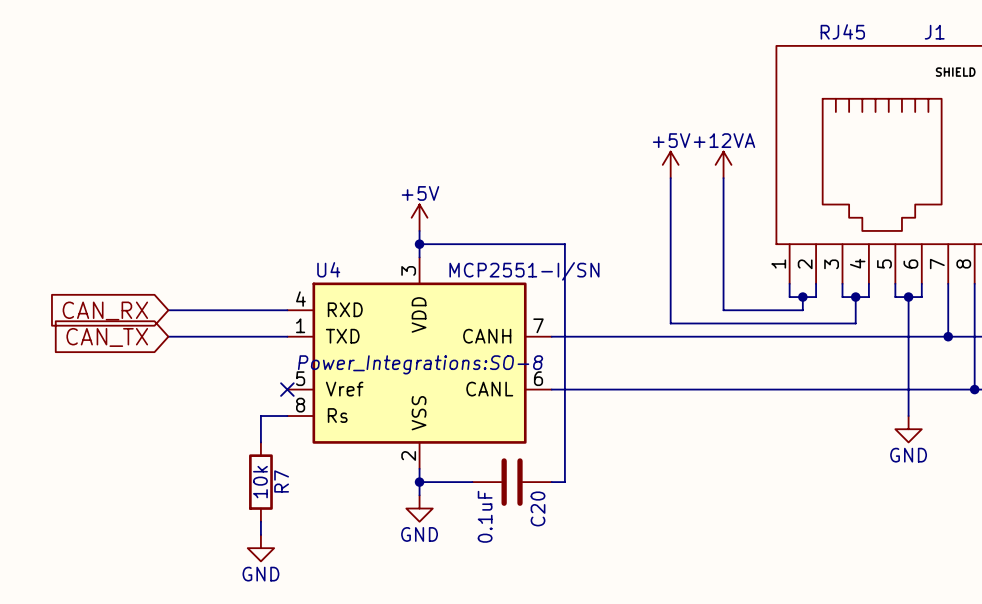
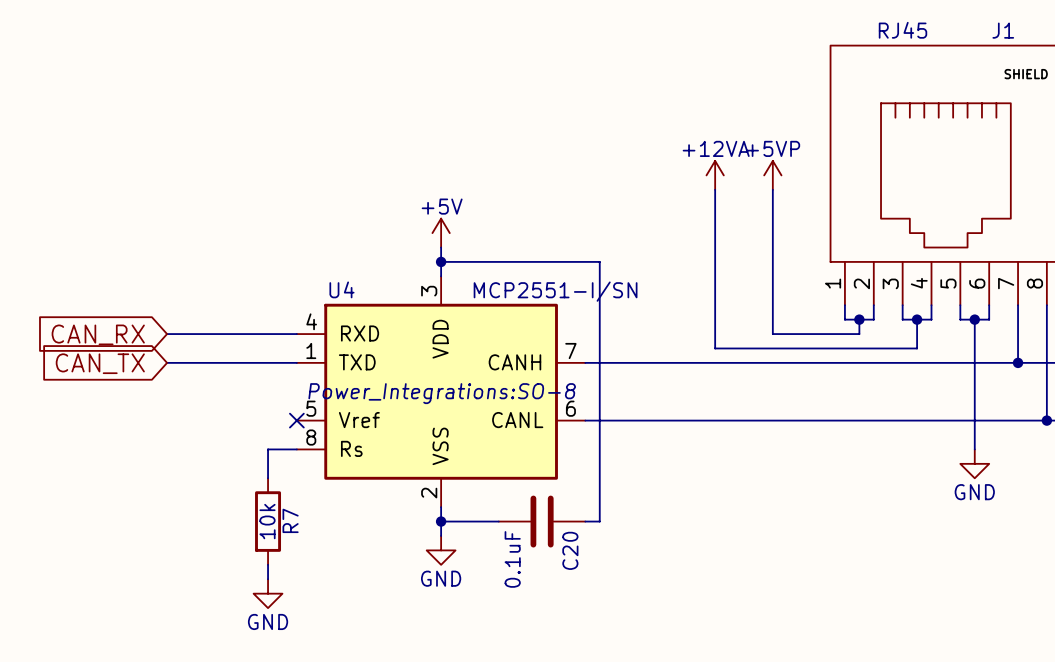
power symbol: +5V (670, 164) -> +12VA (715, 175)
power symbol: +12VA (723, 164) -> +5VP (772, 175)

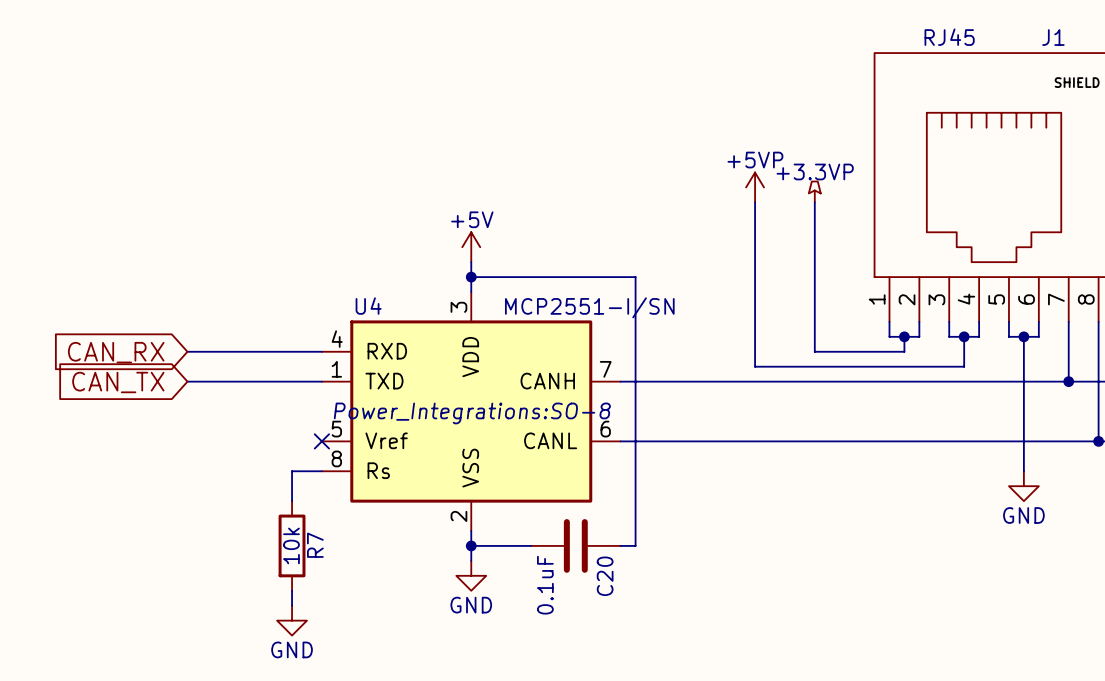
power symbol: +12VA (715, 175) -> +5VP (755, 187)
power symbol: +5VP (772, 175) -> +3.3VP (814, 191)

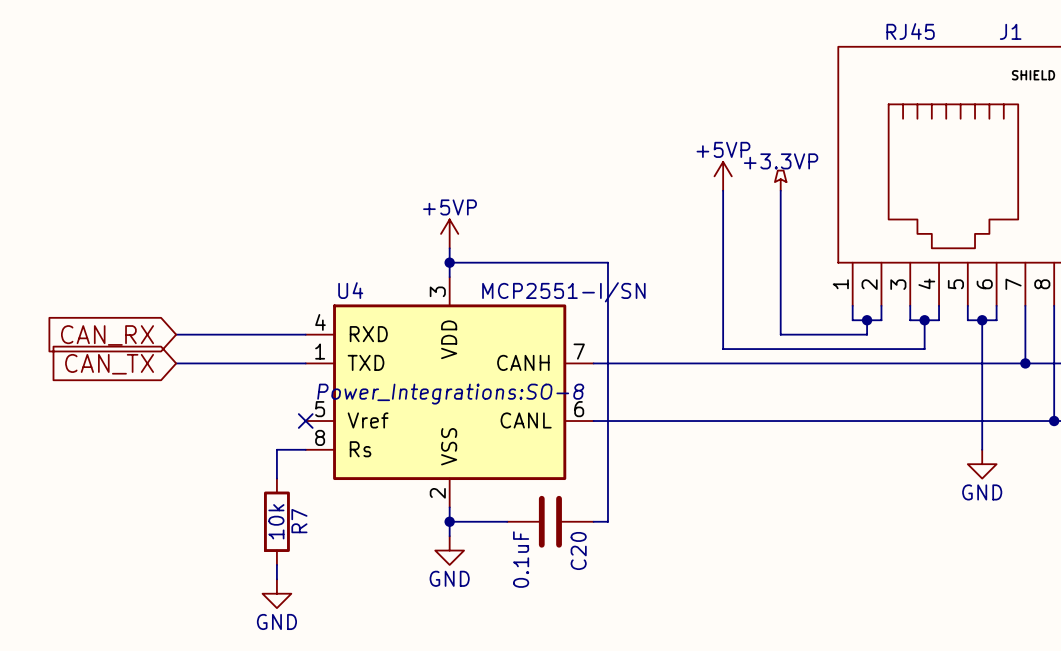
power symbol: +5V (471, 247) -> +5VP (449, 233)

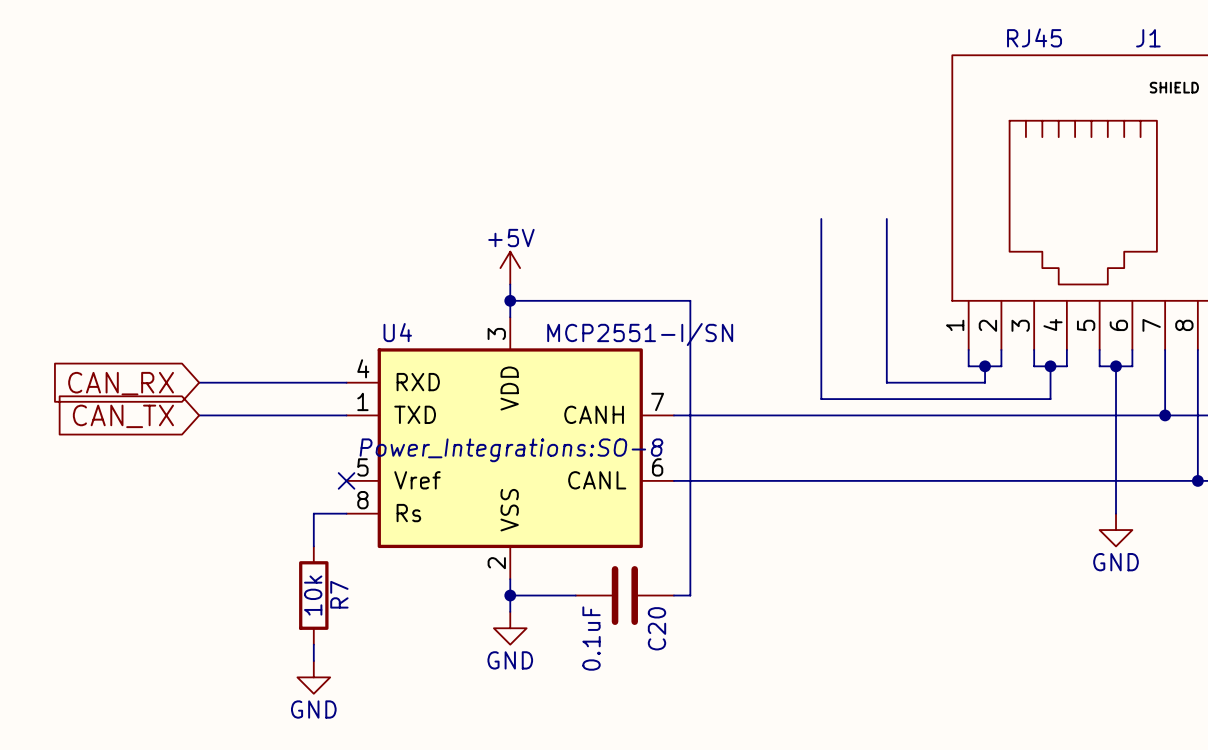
power symbol: +5VP (723, 176) -> none
power symbol: +3.3VP (780, 180) -> none
power symbol: +5VP (449, 233) -> +5V (510, 268)

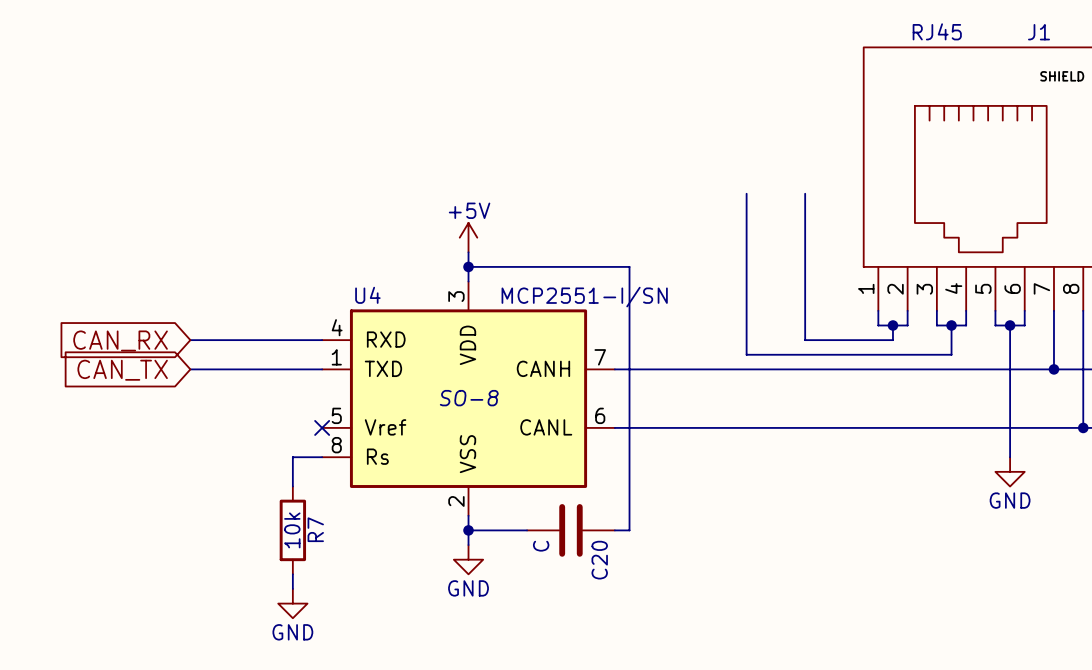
U4 text: Power_Integrations:SO-8 (511, 450) -> SO-8 (469, 398)
C20 value: 0.1uF (591, 638) -> C (541, 546)

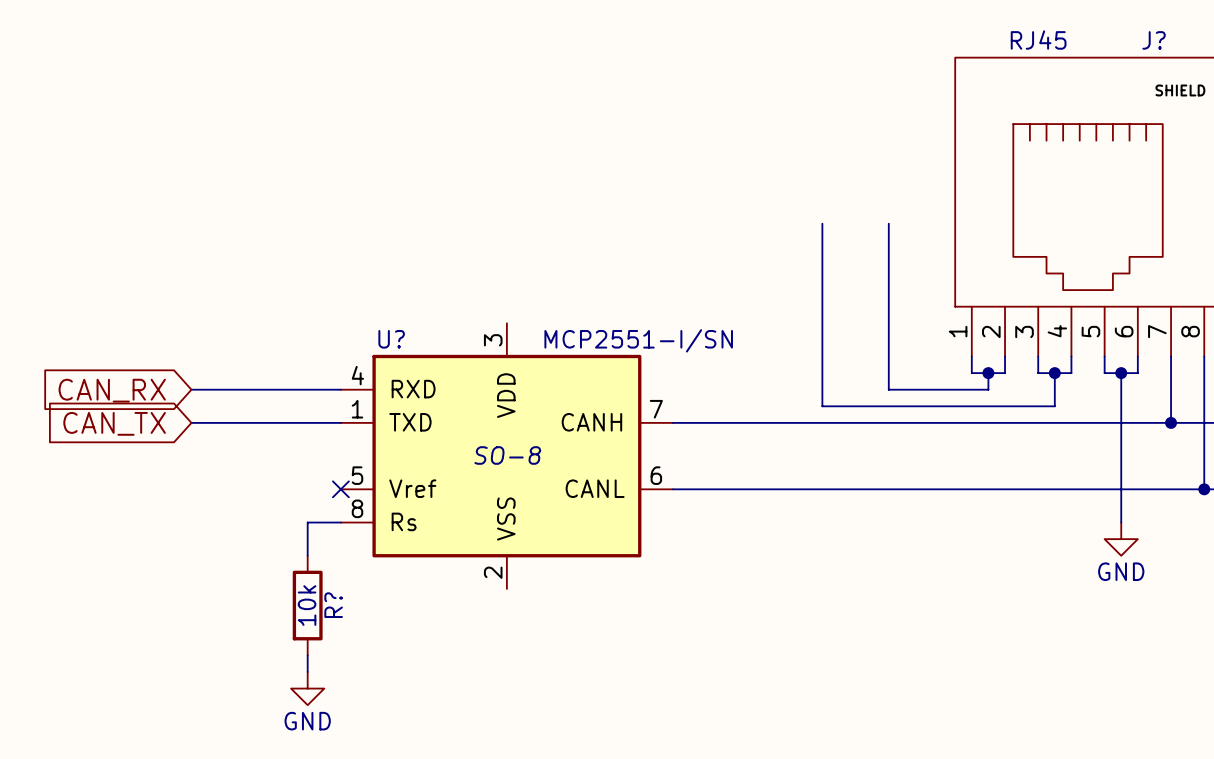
J1 name: J1 (1039, 32) -> J? (1154, 40)
power symbol: +5V (468, 237) -> none
wire: (468, 252) (468, 281) -> none
wire: (468, 266) (629, 266) (629, 530) (614, 530) -> none
junction: (468, 266) -> none
U4 name: U4 (367, 295) -> U? (391, 339)
wire: (468, 515) (468, 545) -> none
R7 name: R7 (315, 529) -> R? (333, 605)
wire: (468, 530) (527, 530) -> none
junction: (468, 530) -> none
C20: C (570, 530) -> none
power symbol: GND (468, 559) -> none

